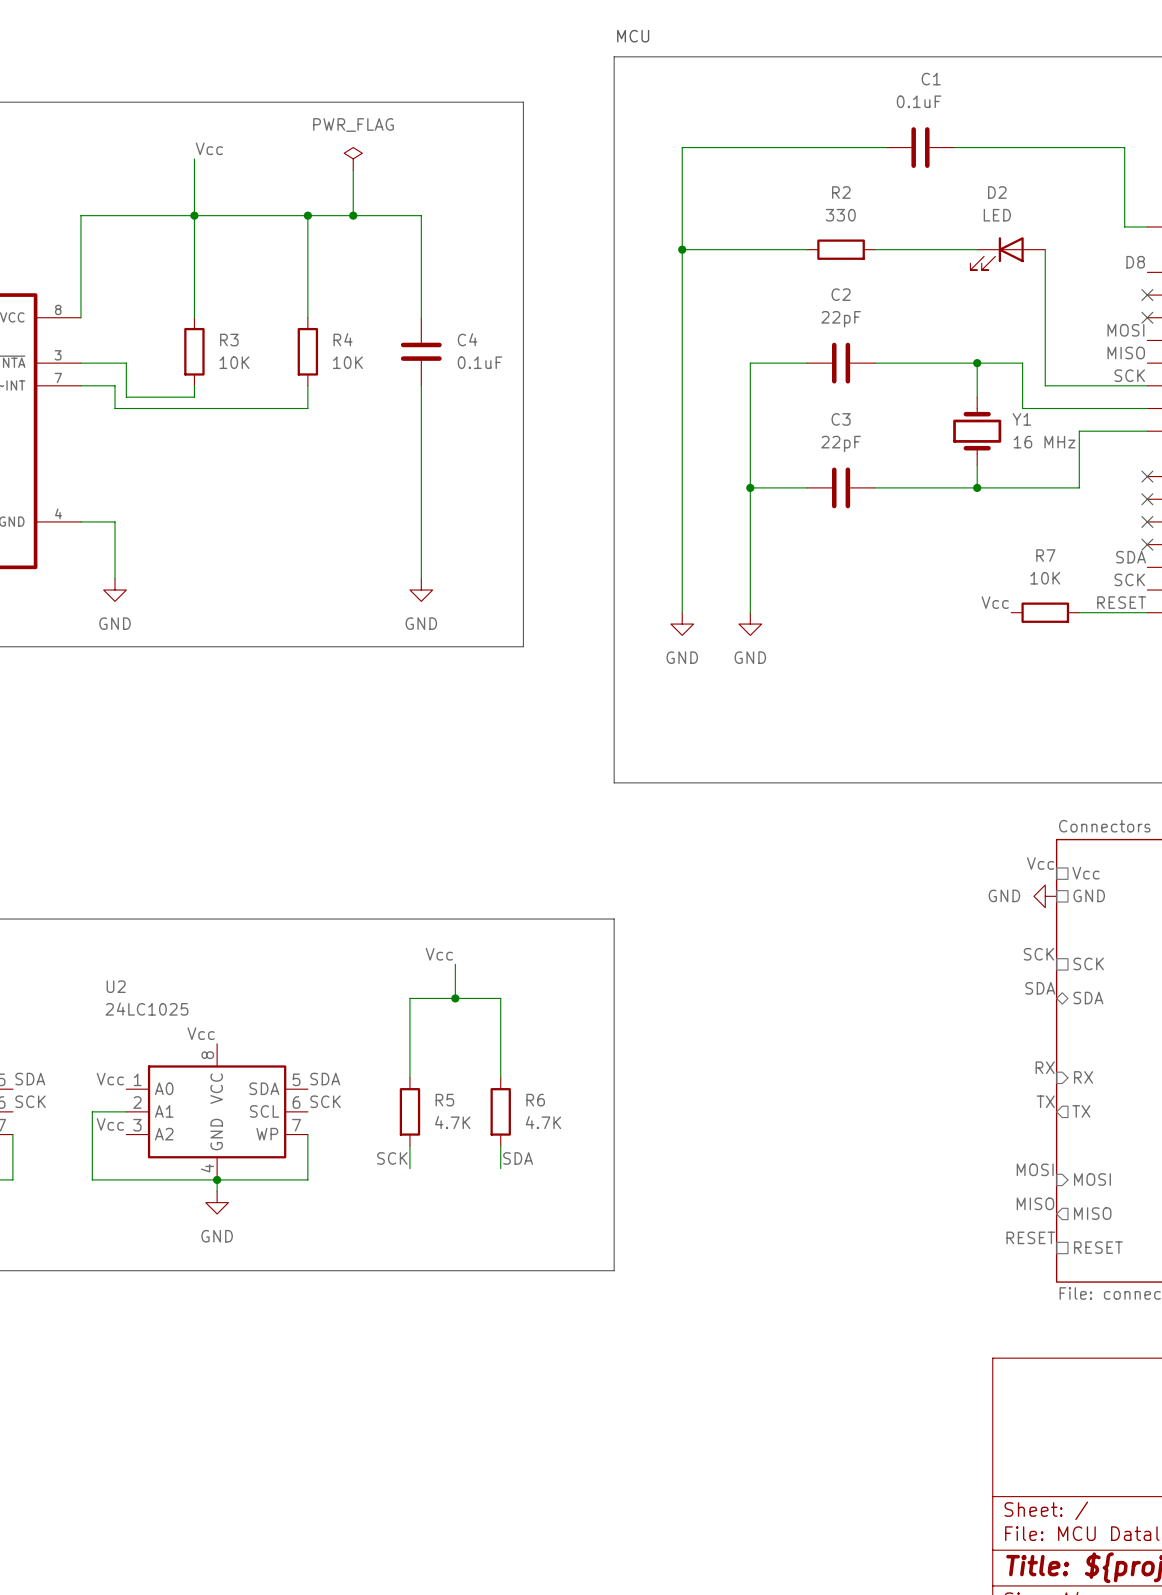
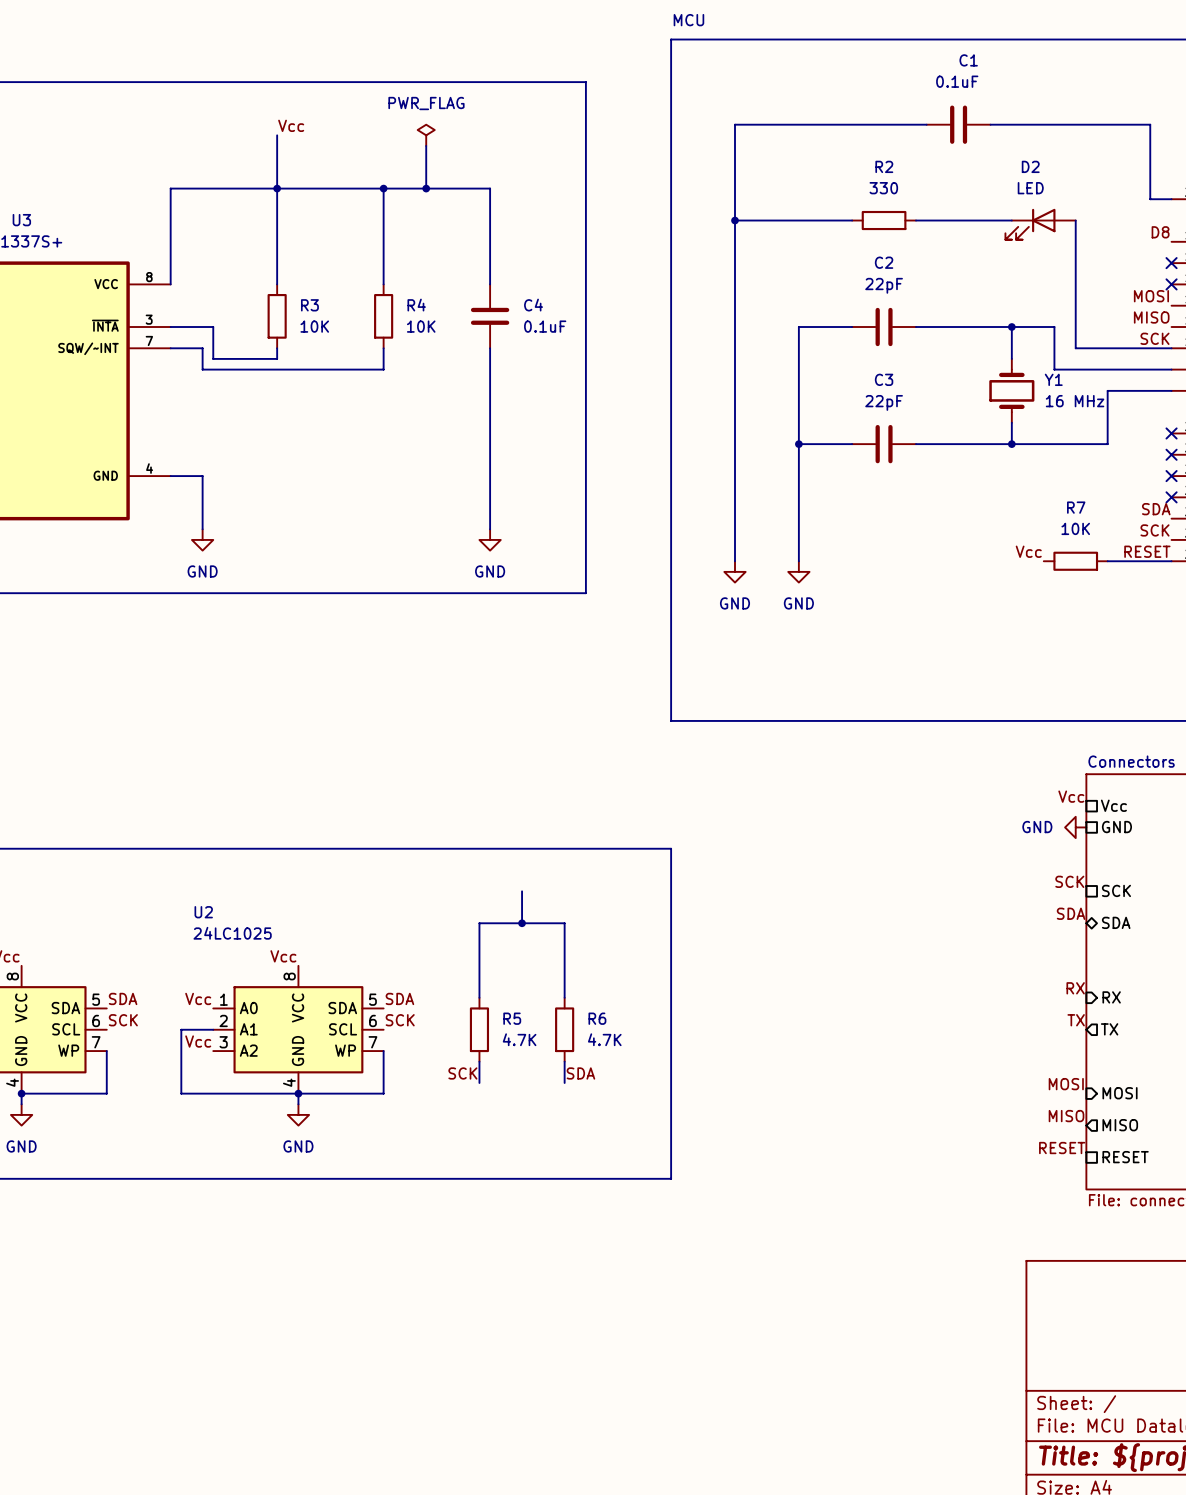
label: Vcc (439, 954) -> none

